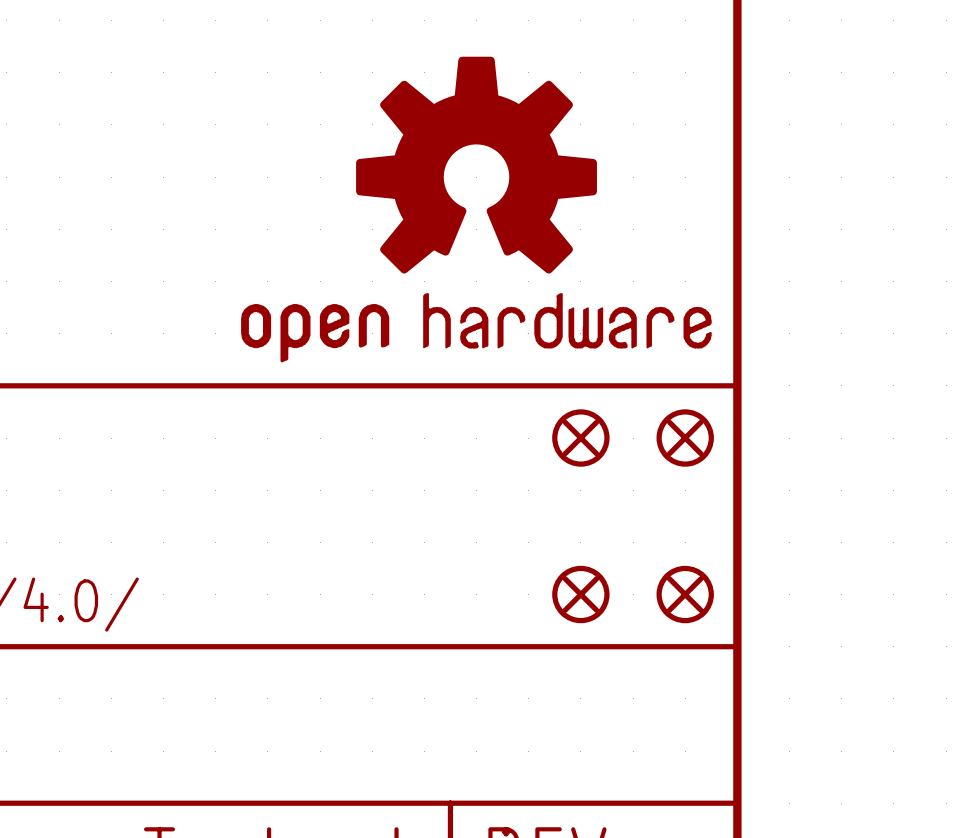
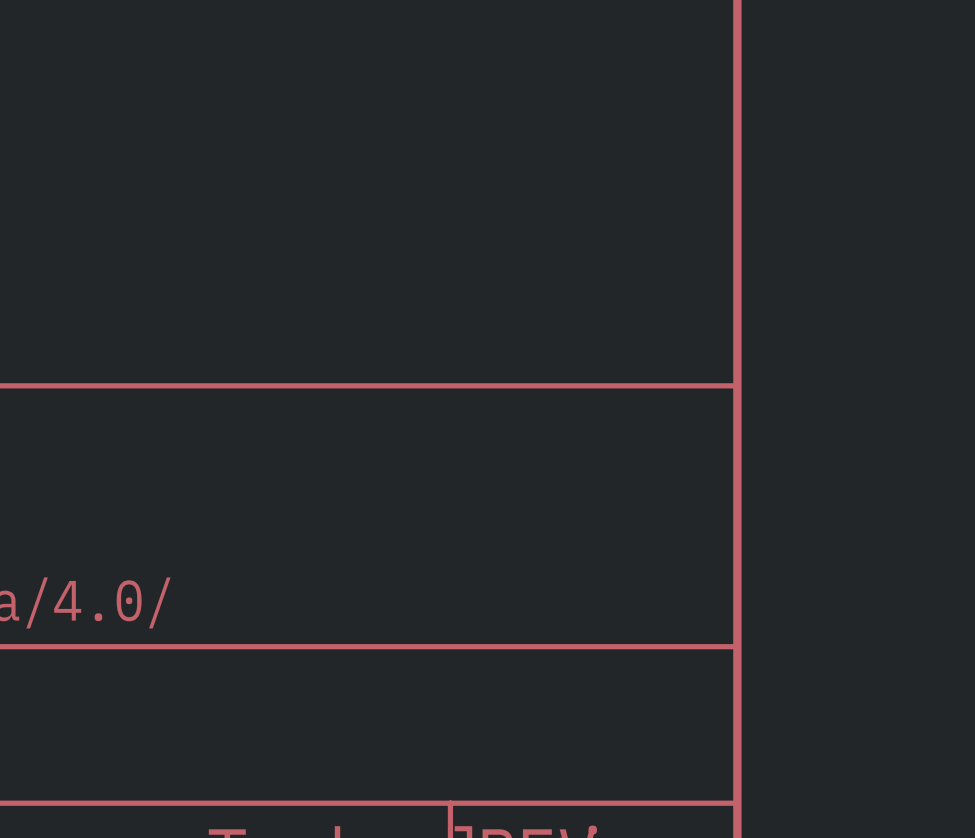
part: (476, 209) -> none
part: (580, 438) -> none
part: (685, 438) -> none
part: (580, 594) -> none
part: (685, 594) -> none

